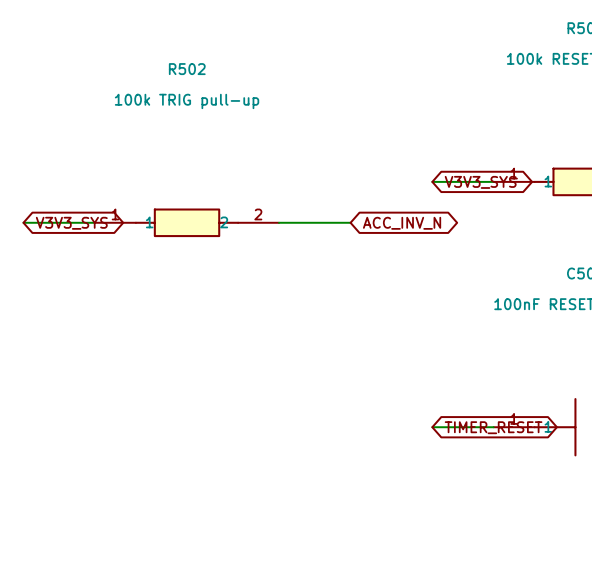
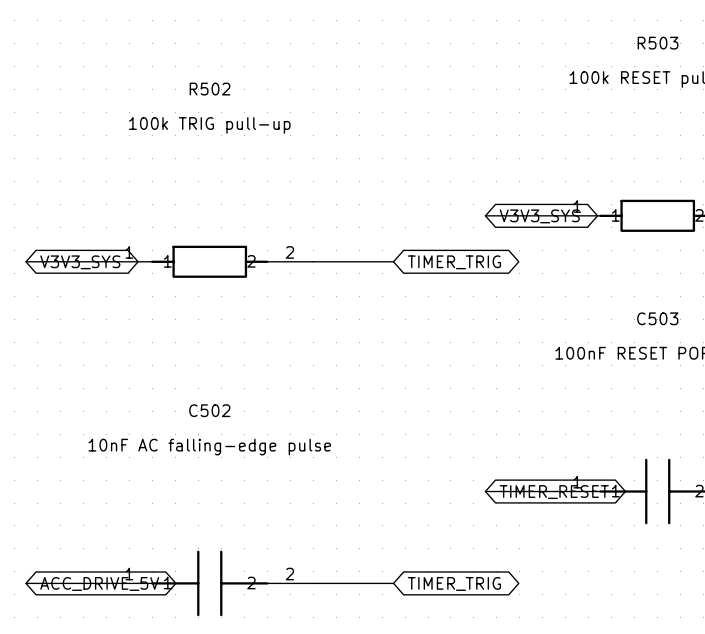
global label: ACC_INV_N (402, 223) -> TIMER_TRIG (454, 262)
wire: none -> (26, 583) (106, 583)
C502: none -> 10nF AC falling-edge pulse (209, 583)
wire: none -> (313, 583) (393, 583)
global label: none -> ACC_DRIVE_5V (99, 583)
global label: none -> TIMER_TRIG (454, 583)

